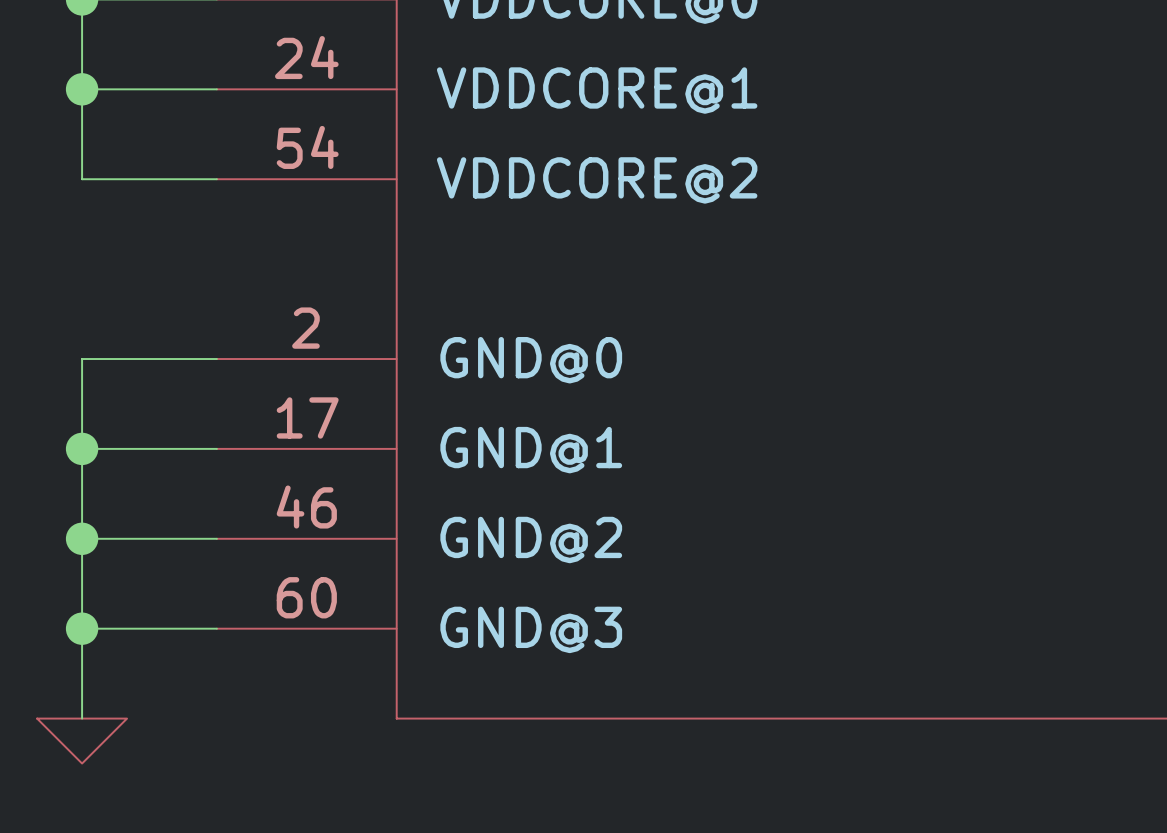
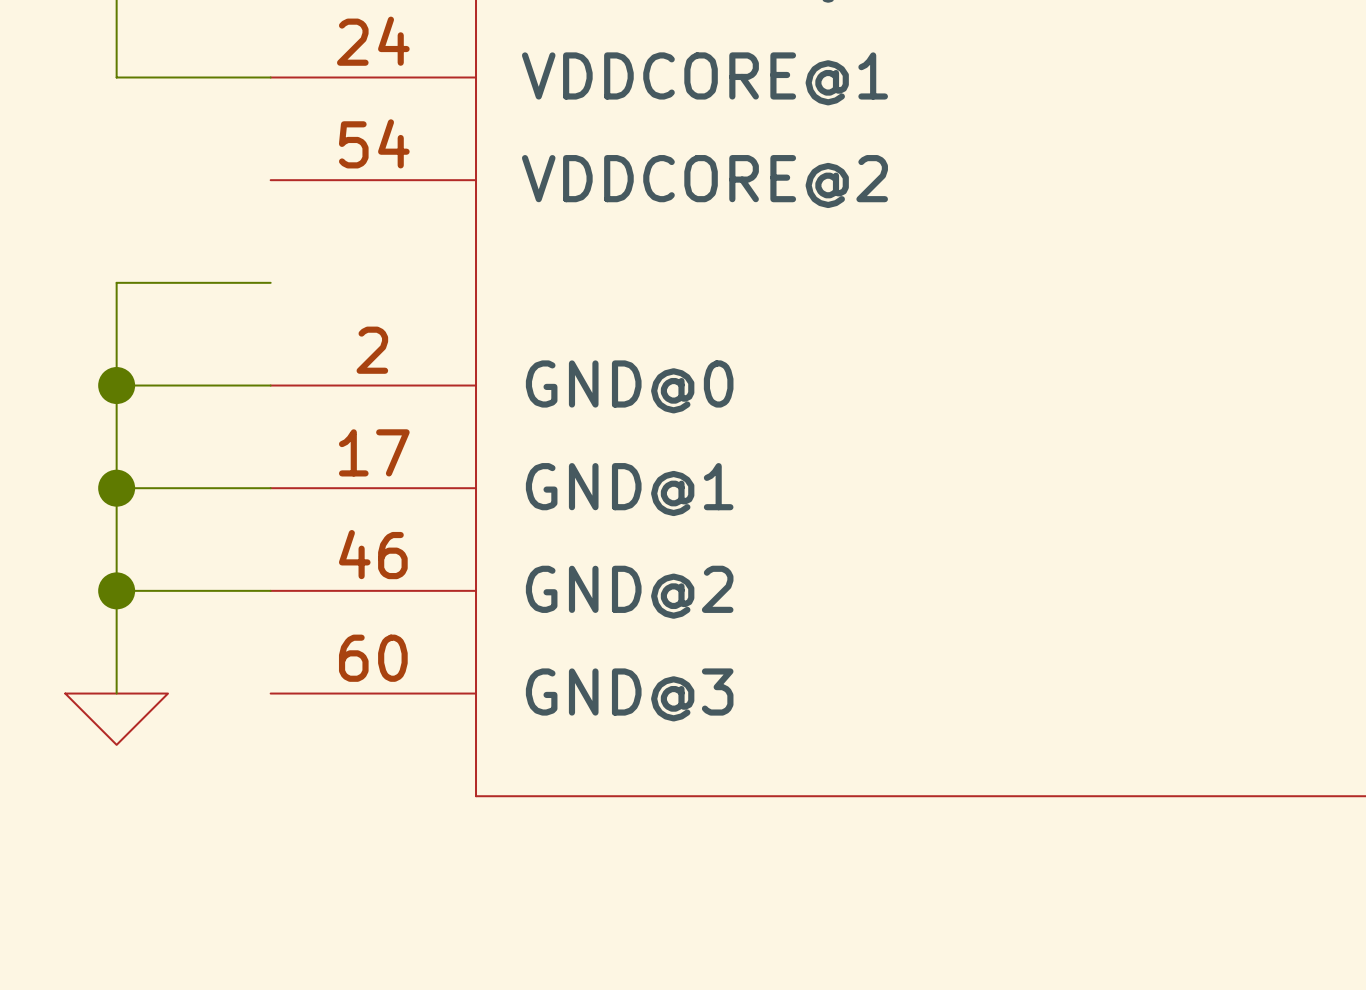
wire: (82, 89) (82, 179) (216, 179) -> none
junction: (82, 89) -> none
junction: none -> (116, 385)
junction: (82, 628) -> none
wire: (216, 628) (82, 628) (82, 718) -> (270, 282) (116, 282) (116, 385)
power symbol position: (82, 741) -> (116, 719)

